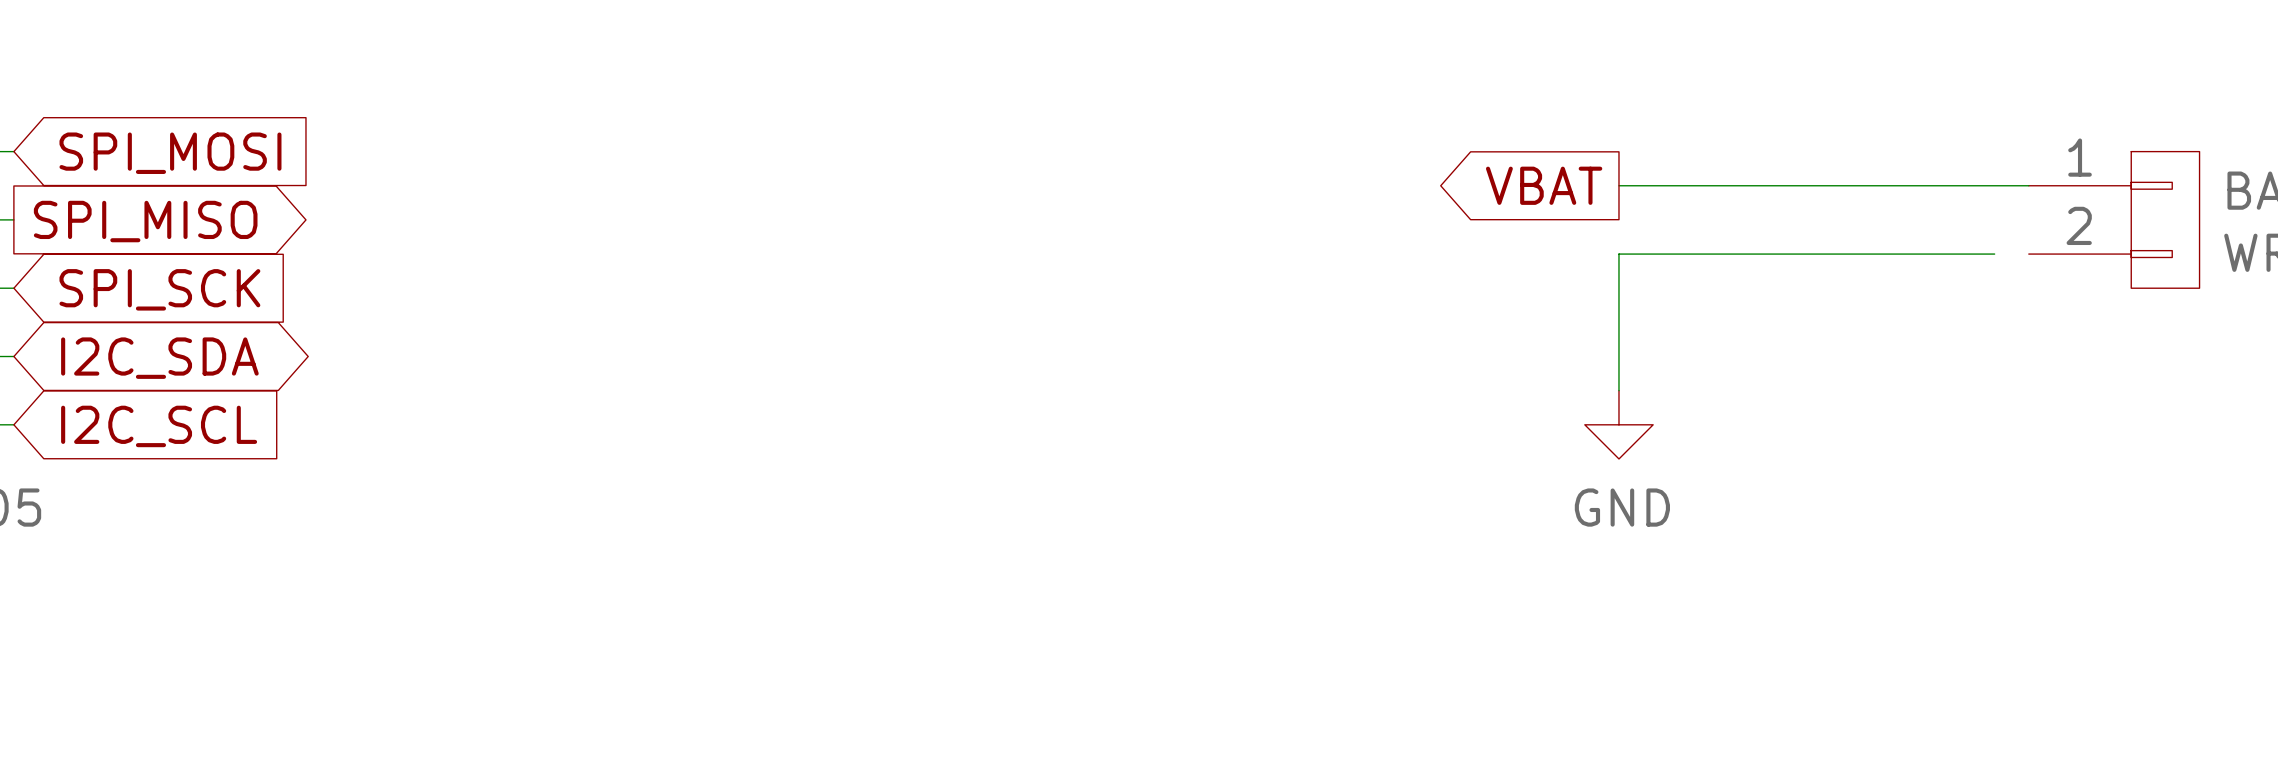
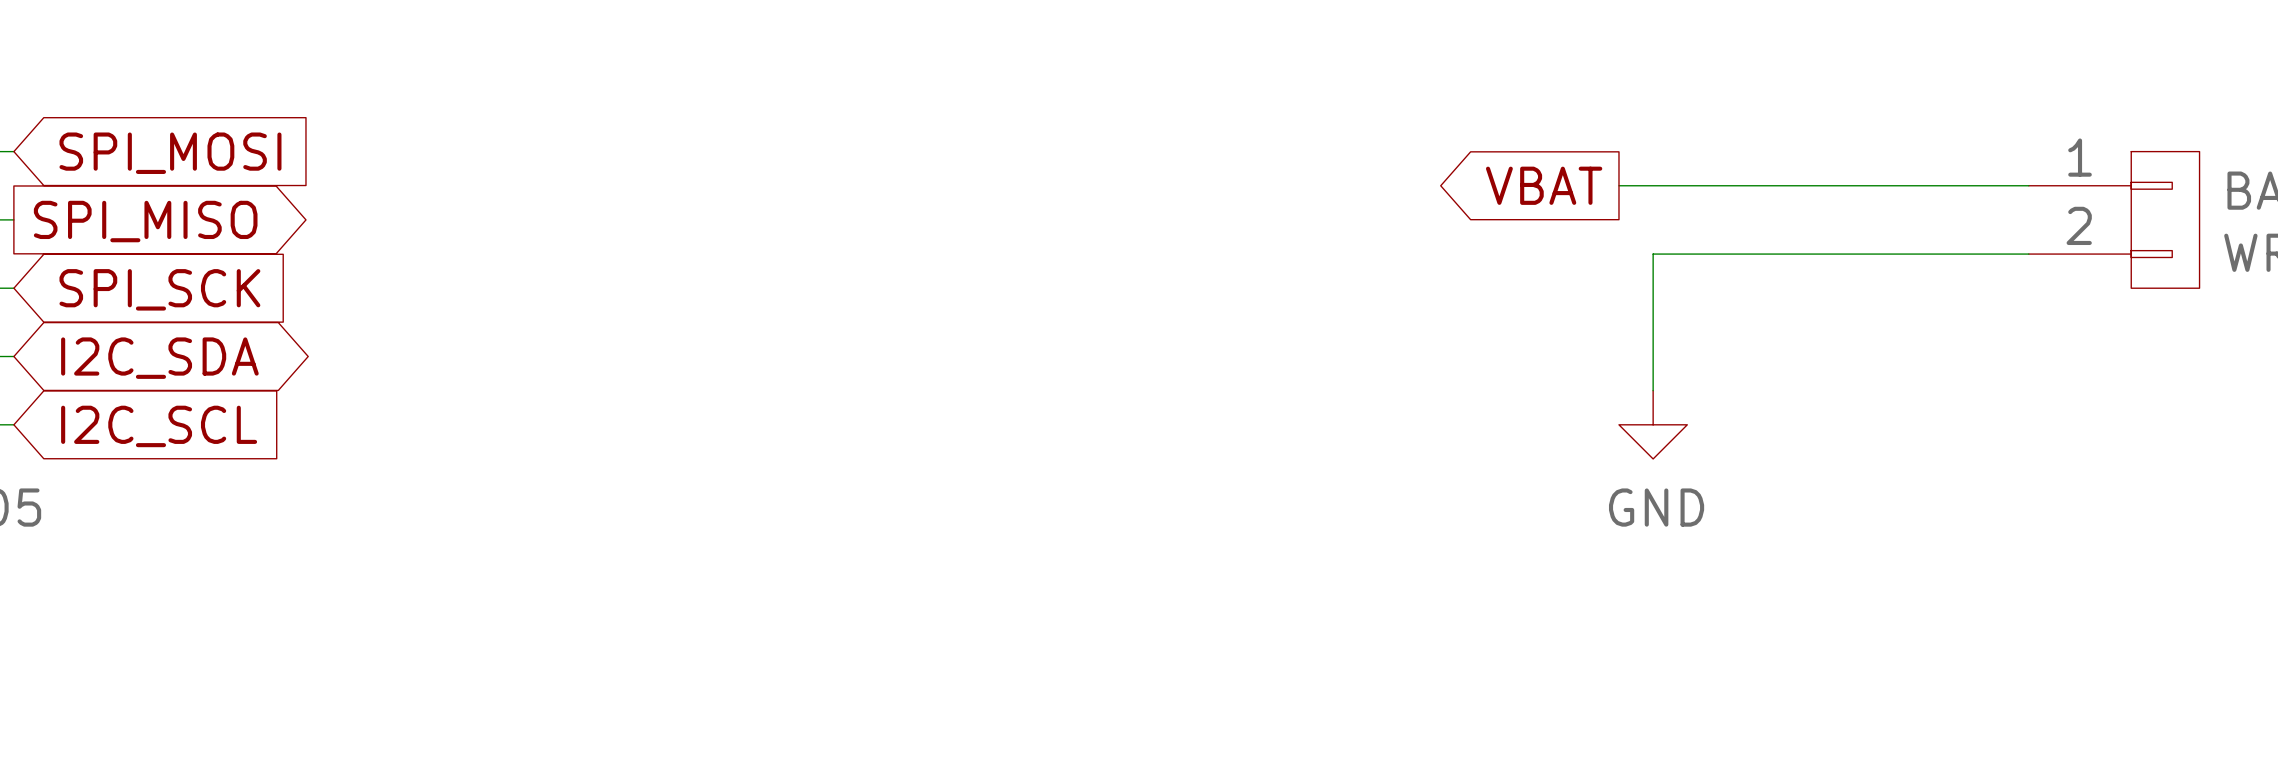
wire: (1653, 254) (1618, 254) (1618, 390) -> (1653, 254) (1653, 390)
wire: none -> (1994, 254) (2028, 254)
power symbol position: GND (1618, 424) -> GND (1653, 424)

